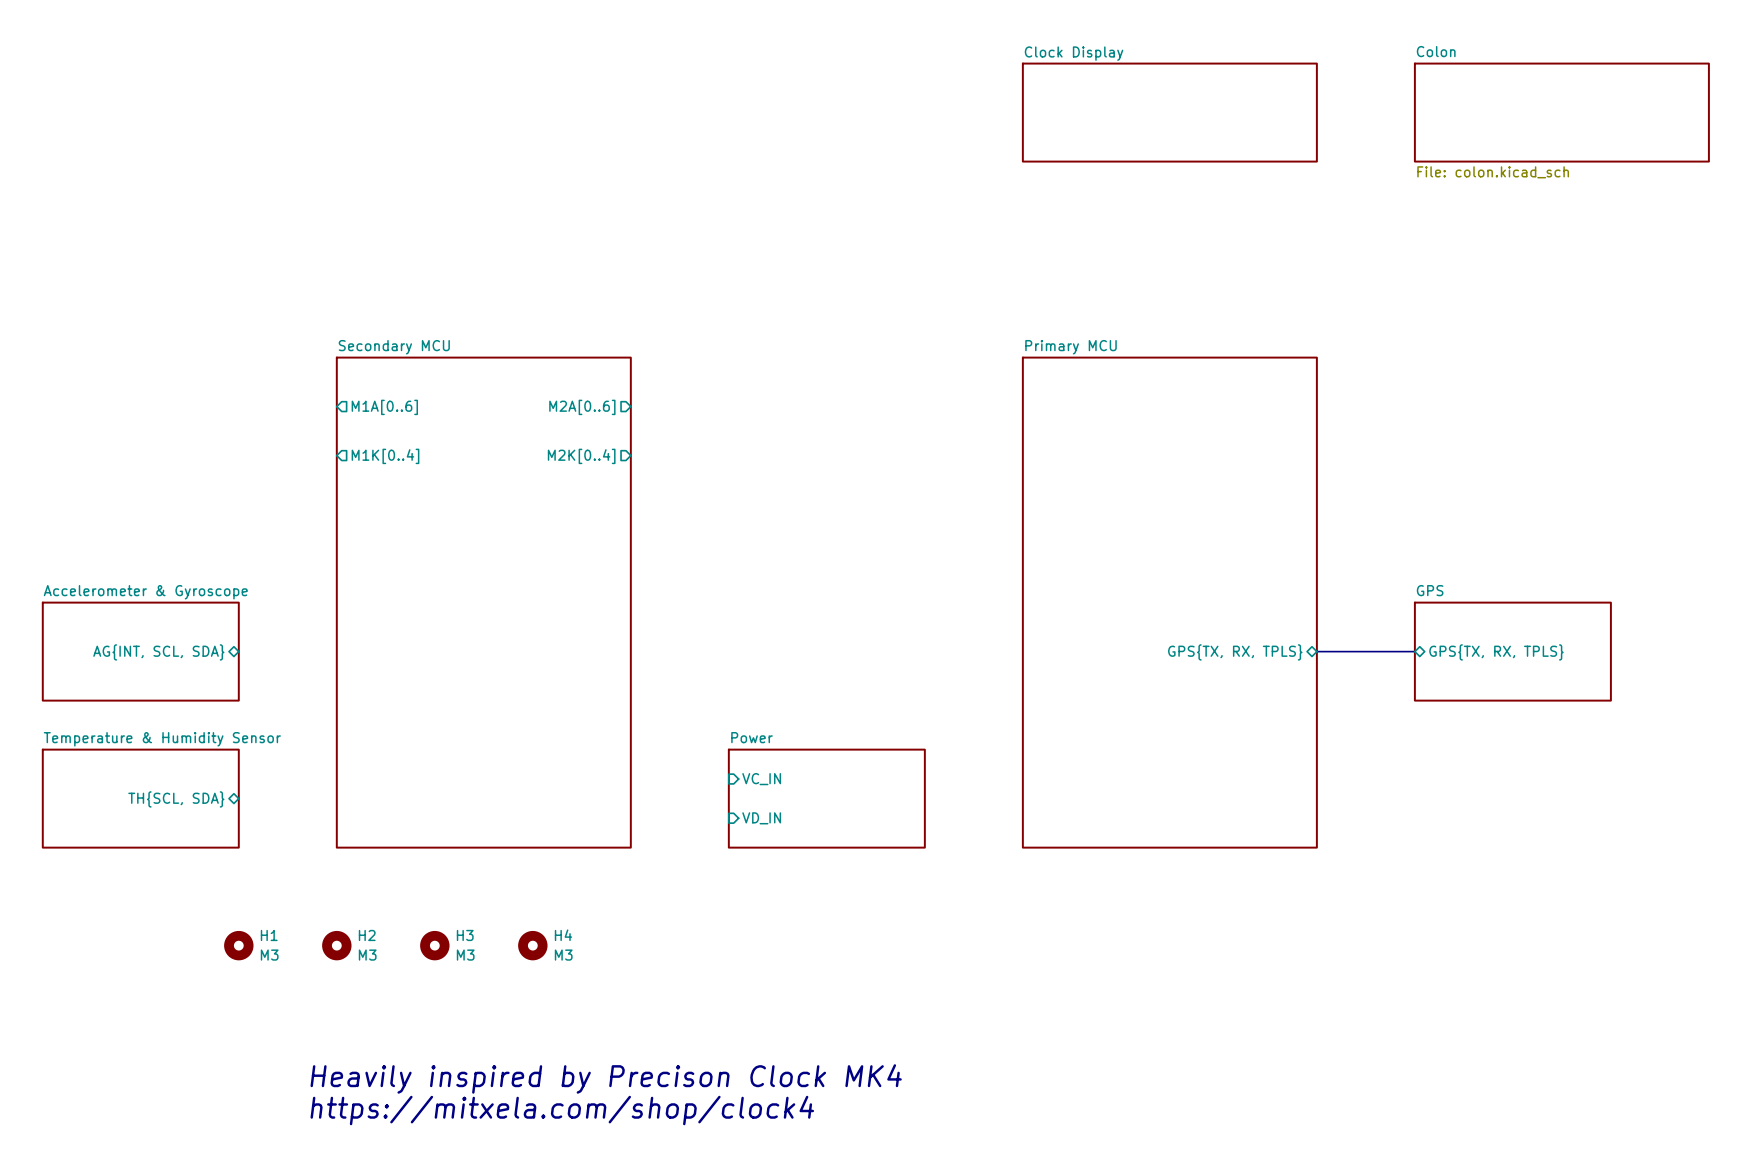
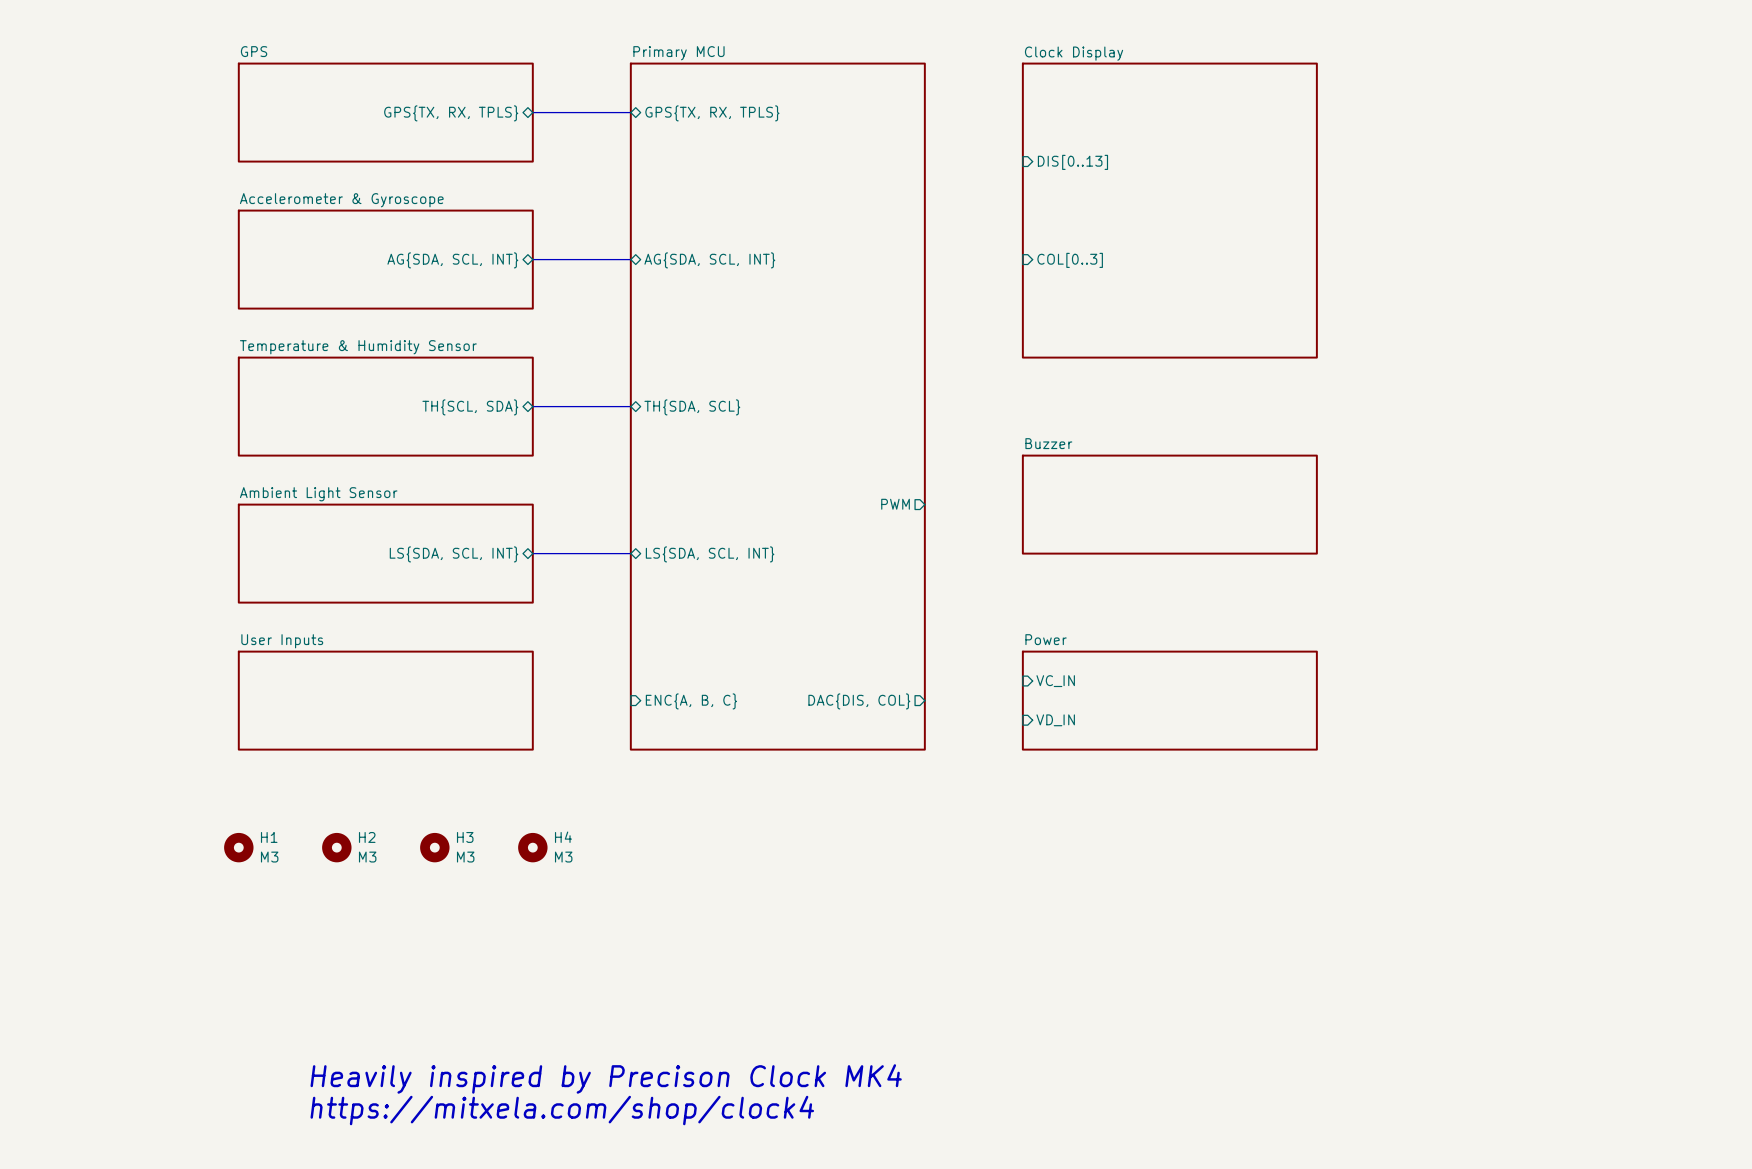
sheet GPS: none -> (385, 112)
bus: none -> (532, 112) (630, 112)
sheet Clock Display: (1169, 112) -> none
sheet Colon: File: colon.kicad_sch (1561, 112) -> none
sheet pin: none -> GPS{TX, RX, TPLS} (451, 113)
sheet pin: none -> GPS{TX, RX, TPLS} (712, 113)
sheet pin: none -> DIS[0..13] (1072, 162)
sheet Clock Display: none -> (1169, 210)
sheet Accelerometer & Gyroscope: none -> (385, 259)
bus: none -> (532, 259) (630, 259)
sheet pin: none -> AG{SDA, SCL, INT} (452, 260)
sheet pin: none -> AG{SDA, SCL, INT} (709, 260)
sheet pin: none -> COL[0..3] (1070, 260)
sheet Temperature & Humidity Sensor: none -> (385, 406)
bus: none -> (532, 406) (630, 406)
sheet Primary MCU: none -> (777, 406)
sheet pin: M1A[0..6] (384, 407) -> none
sheet pin: none -> TH{SCL, SDA} (470, 407)
sheet pin: M2A[0..6] (582, 407) -> none
sheet pin: none -> TH{SDA, SCL} (692, 407)
sheet pin: M1K[0..4] (385, 456) -> none
sheet pin: M2K[0..4] (581, 456) -> none
sheet pin: none -> PWM (895, 504)
sheet Buzzer: none -> (1169, 504)
sheet Ambient Light Sensor: none -> (385, 553)
bus: none -> (532, 553) (630, 553)
sheet pin: none -> LS{SDA, SCL, INT} (454, 554)
sheet pin: none -> LS{SDA, SCL, INT} (710, 554)
sheet Secondary MCU: (483, 602) -> none
sheet Primary MCU: (1169, 602) -> none
sheet Accelerometer & Gyroscope: (140, 651) -> none
bus: (1316, 651) (1414, 651) -> none
sheet GPS: (1512, 651) -> none
sheet pin: AG{INT, SCL, SDA} (158, 652) -> none
sheet pin: GPS{TX, RX, TPLS} (1235, 652) -> none
sheet pin: GPS{TX, RX, TPLS} (1496, 652) -> none
sheet pin: none -> VC_IN (1055, 681)
sheet User Inputs: none -> (385, 700)
sheet Power: none -> (1169, 700)
sheet pin: none -> ENC{A, B, C} (691, 701)
sheet pin: none -> DAC{DIS, COL} (859, 701)
sheet pin: none -> VD_IN (1055, 720)
sheet pin: VC_IN (761, 779) -> none
sheet Temperature & Humidity Sensor: (140, 798) -> none
sheet Power: (826, 798) -> none
sheet pin: TH{SCL, SDA} (176, 799) -> none
sheet pin: VD_IN (761, 818) -> none
H1 position: (238, 945) -> (238, 847)
H2 position: (336, 945) -> (336, 847)
H3 position: (434, 945) -> (434, 847)
H4 position: (532, 945) -> (532, 847)

